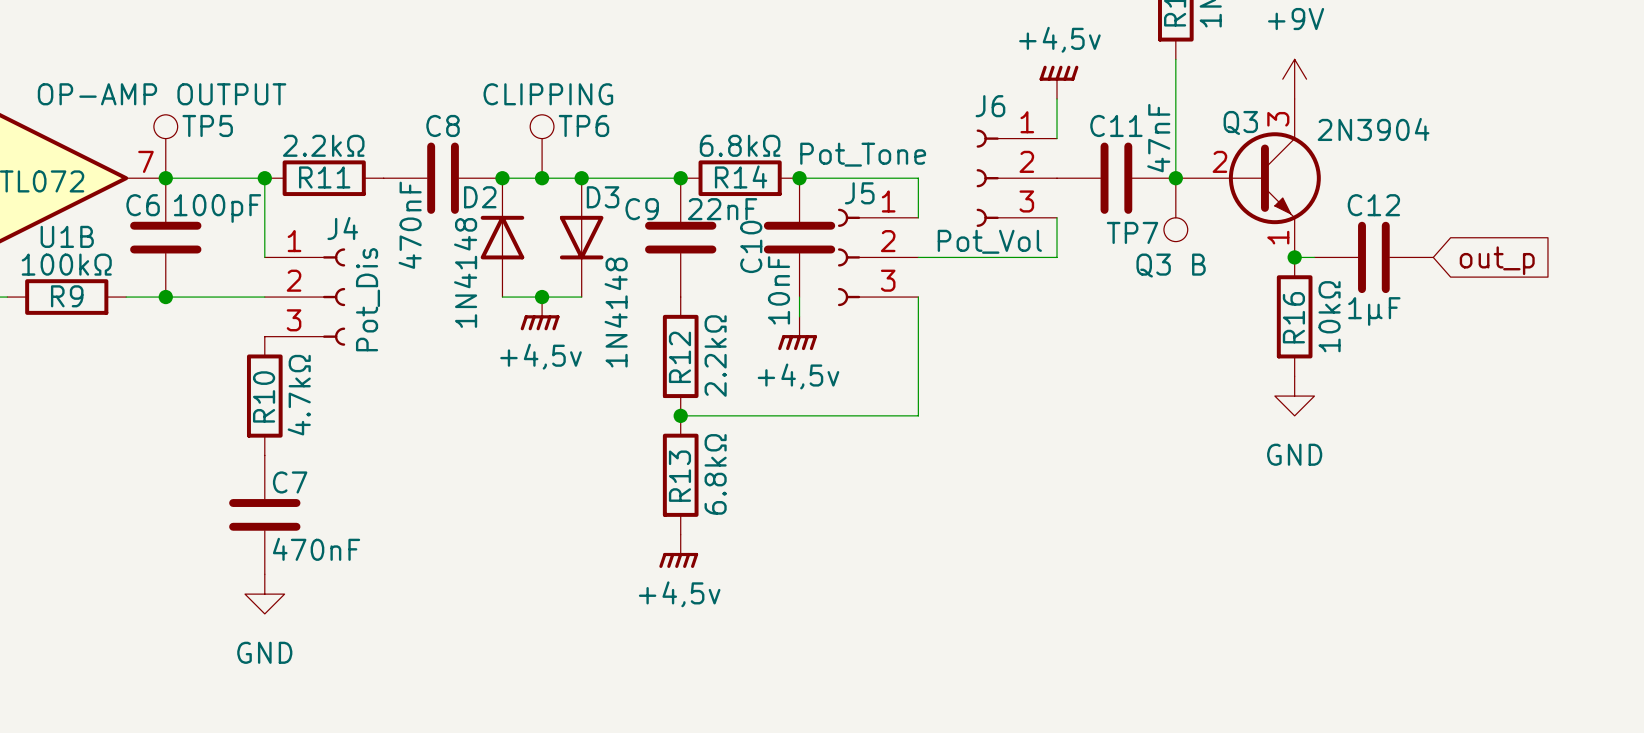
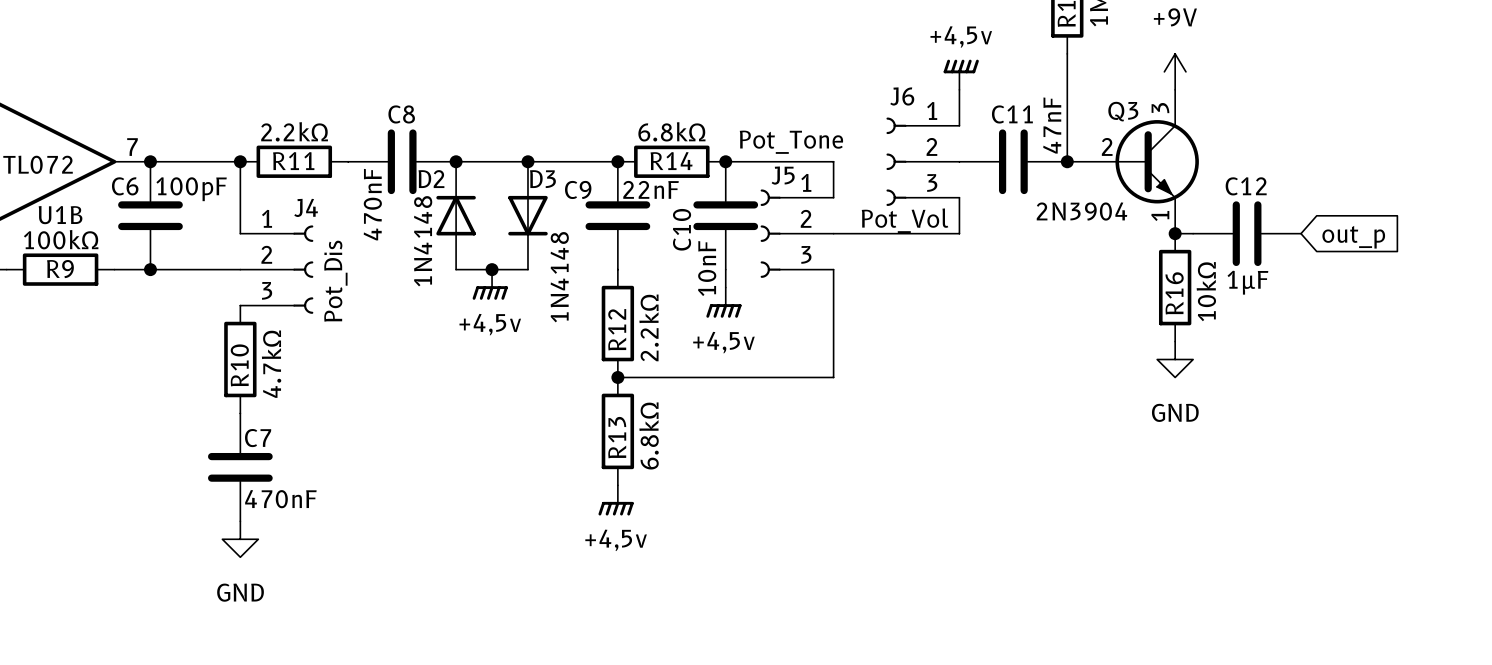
Q3 value position: 2N3904 (1373, 129) -> 2N3904 (1081, 211)
TP5: OP-AMP OUTPUT (165, 146) -> none
TP6: CLIPPING (542, 146) -> none
junction: (542, 178) -> none
TP7: Q3 B (1175, 209) -> none

